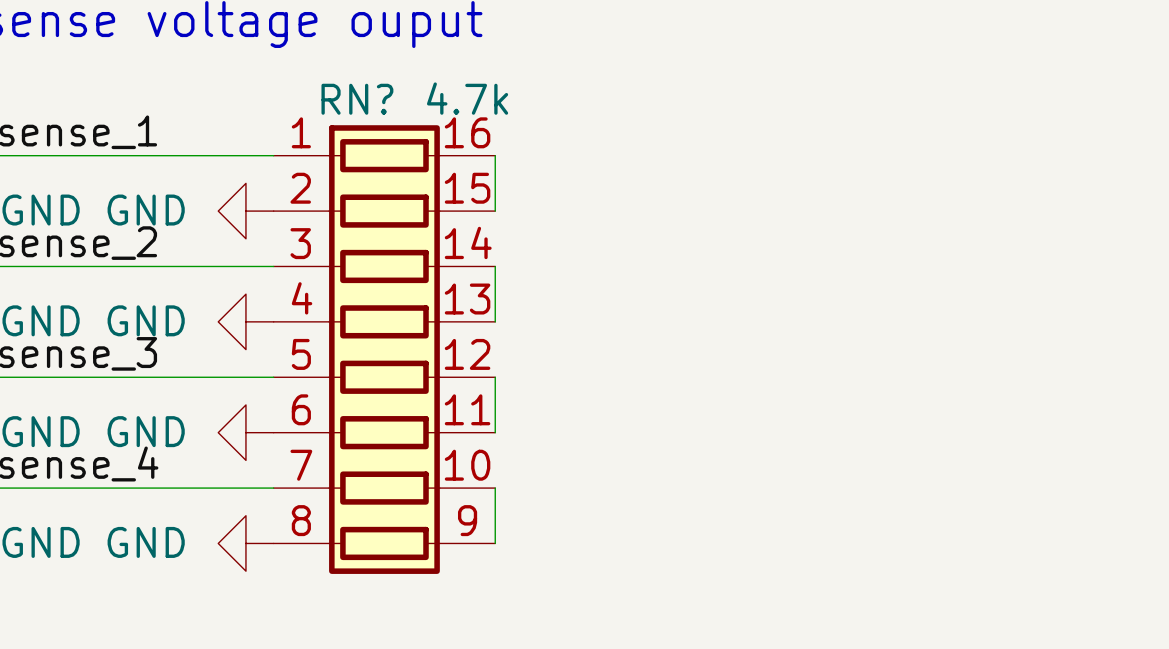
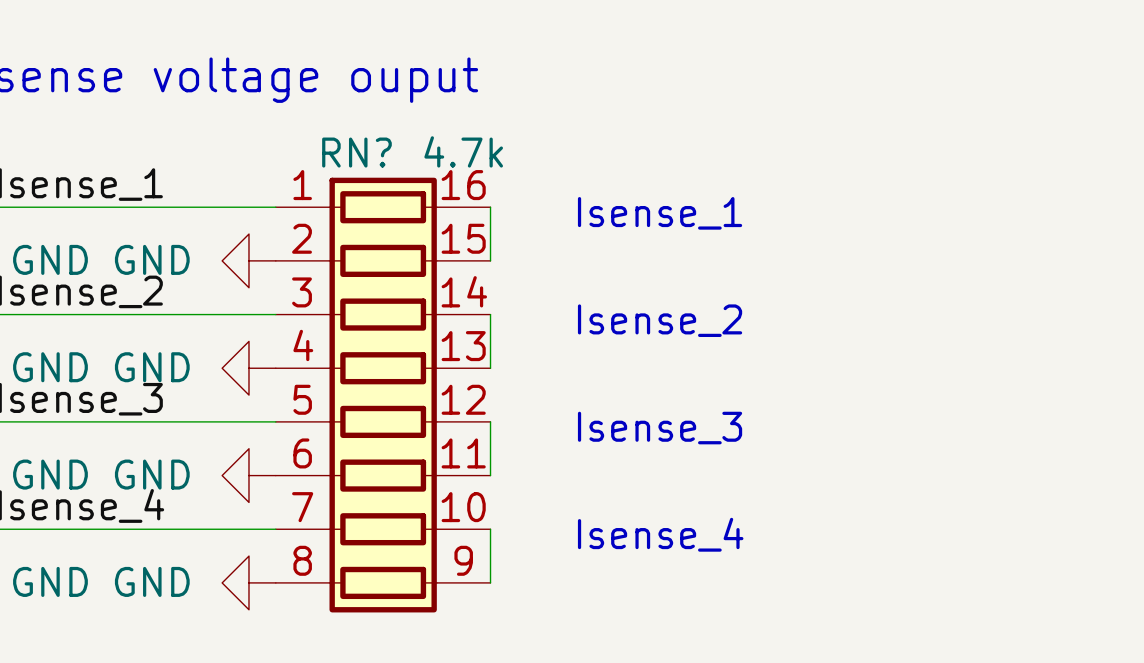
text: none -> Isense_1 (660, 213)
text: none -> Isense_2 (660, 320)
text: none -> Isense_3 (660, 428)
text: none -> Isense_4 (660, 534)

